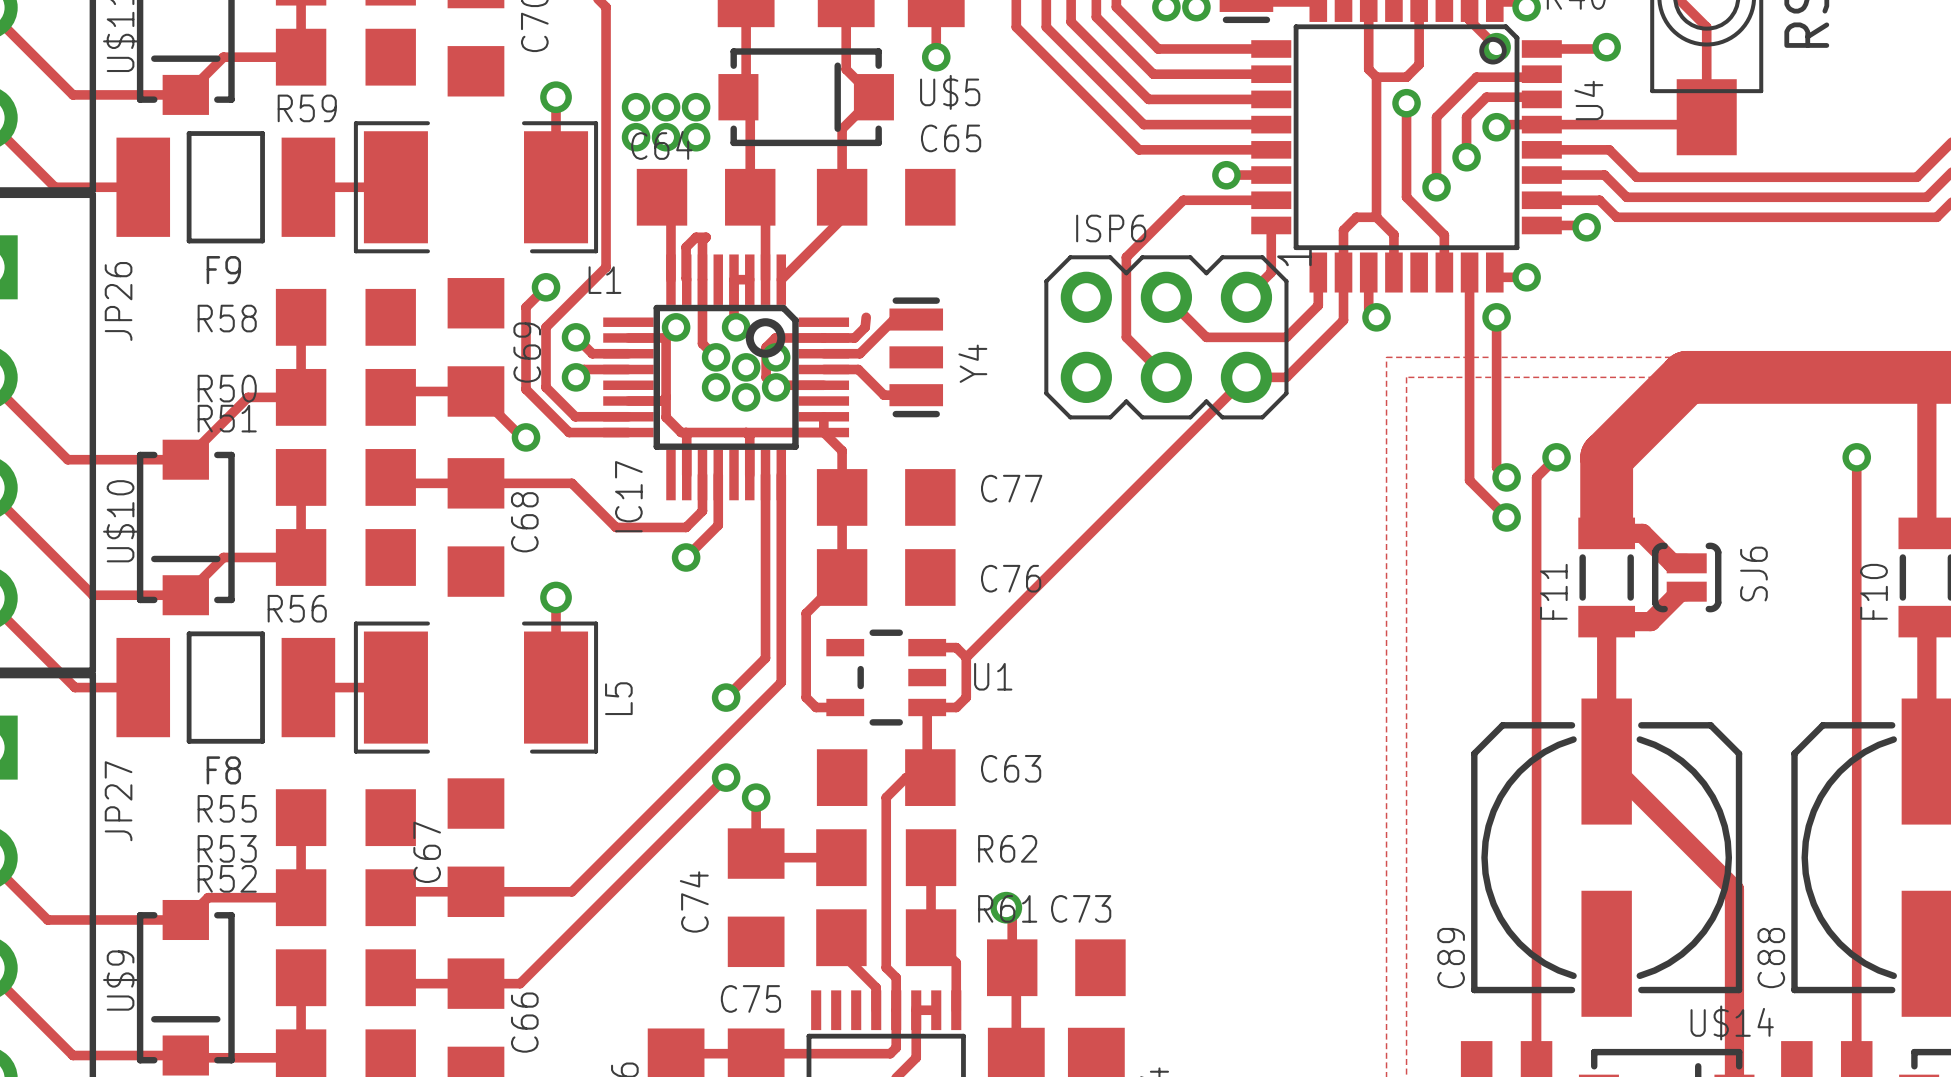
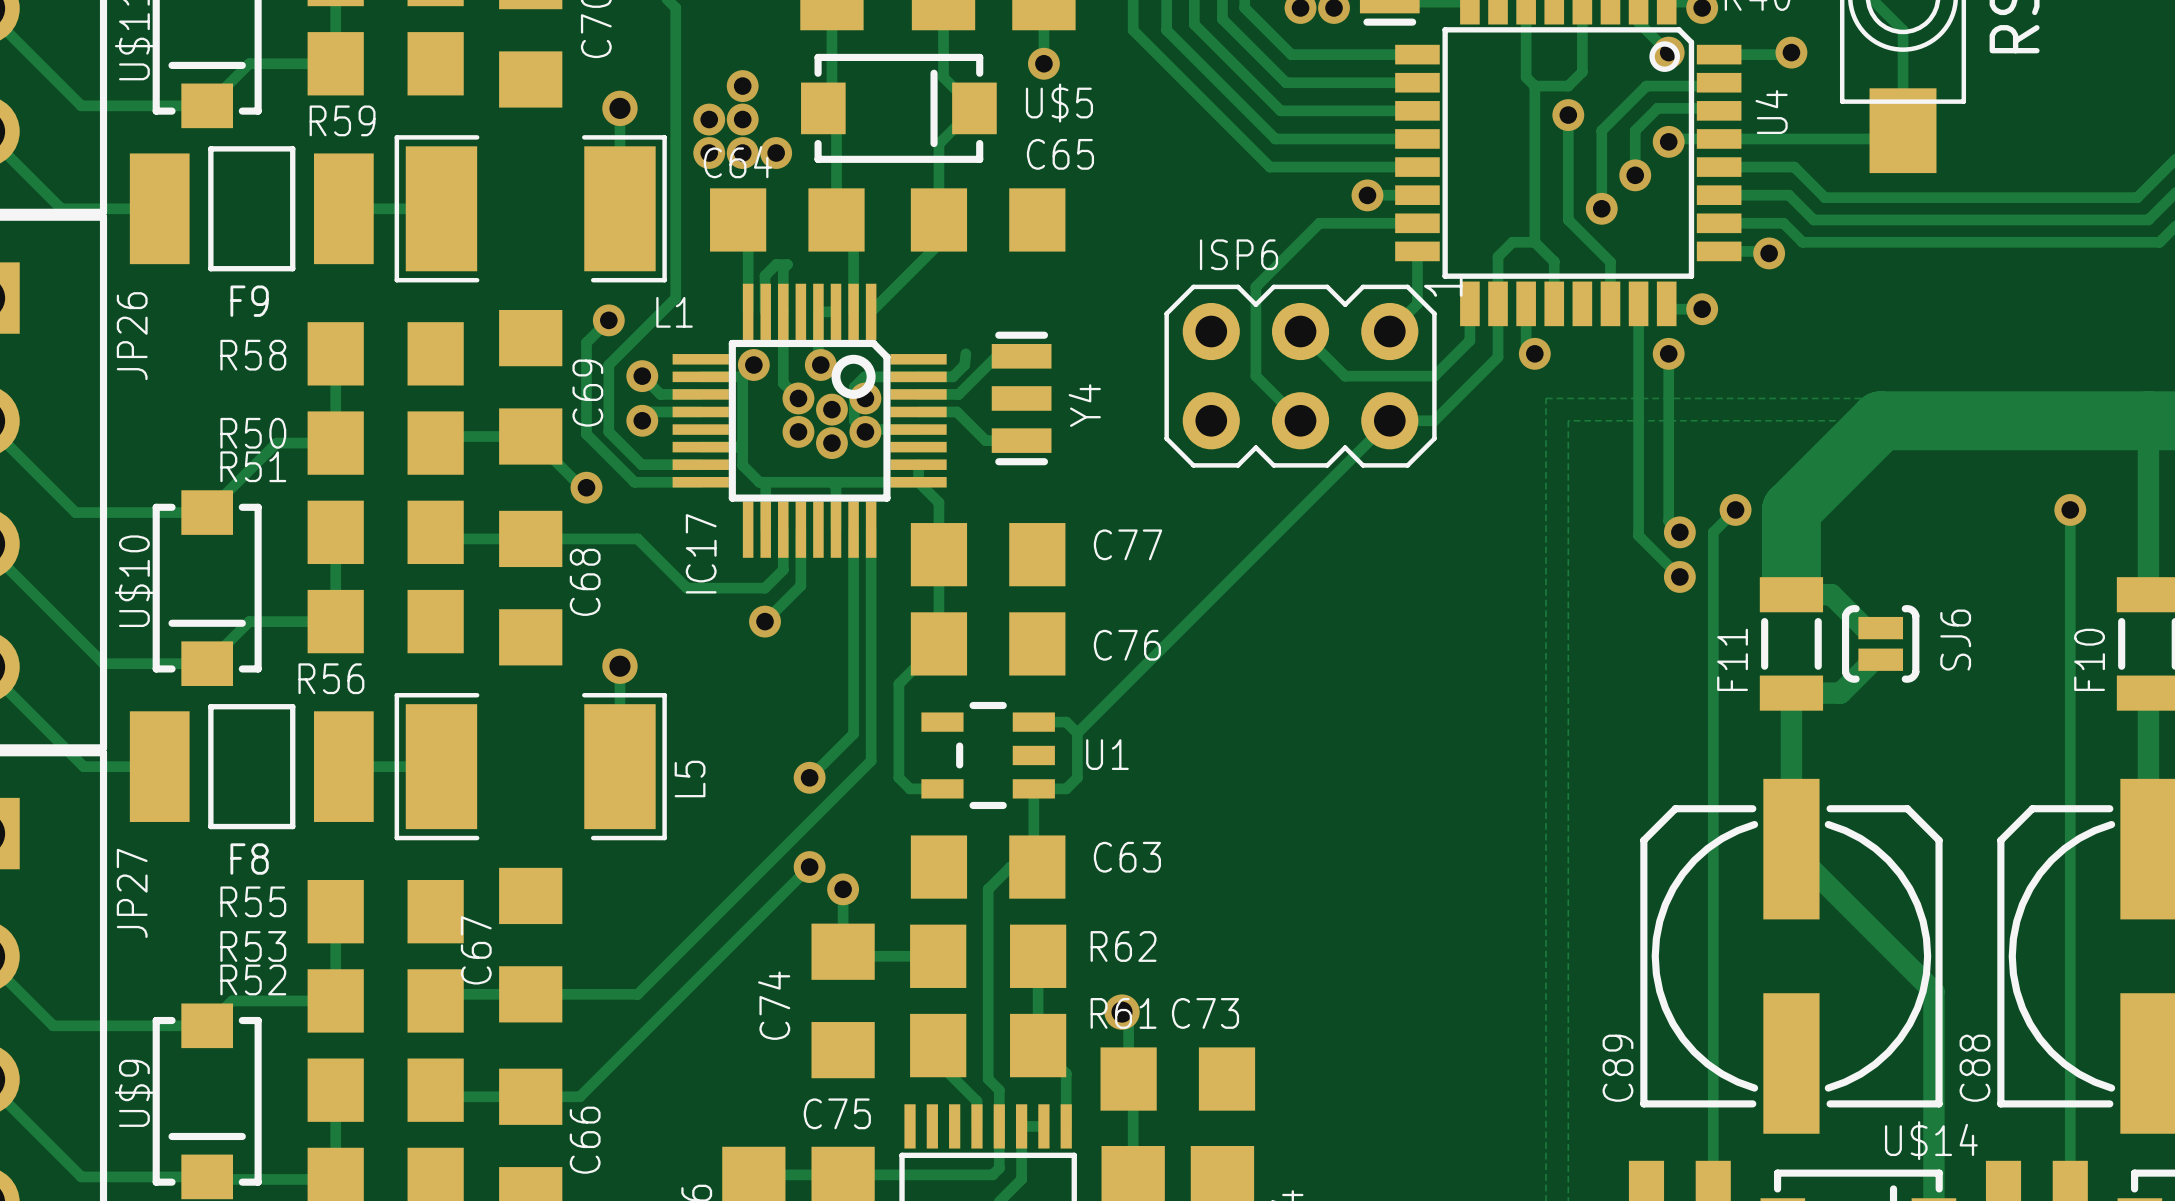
via position: (696, 107) -> (742, 86)

